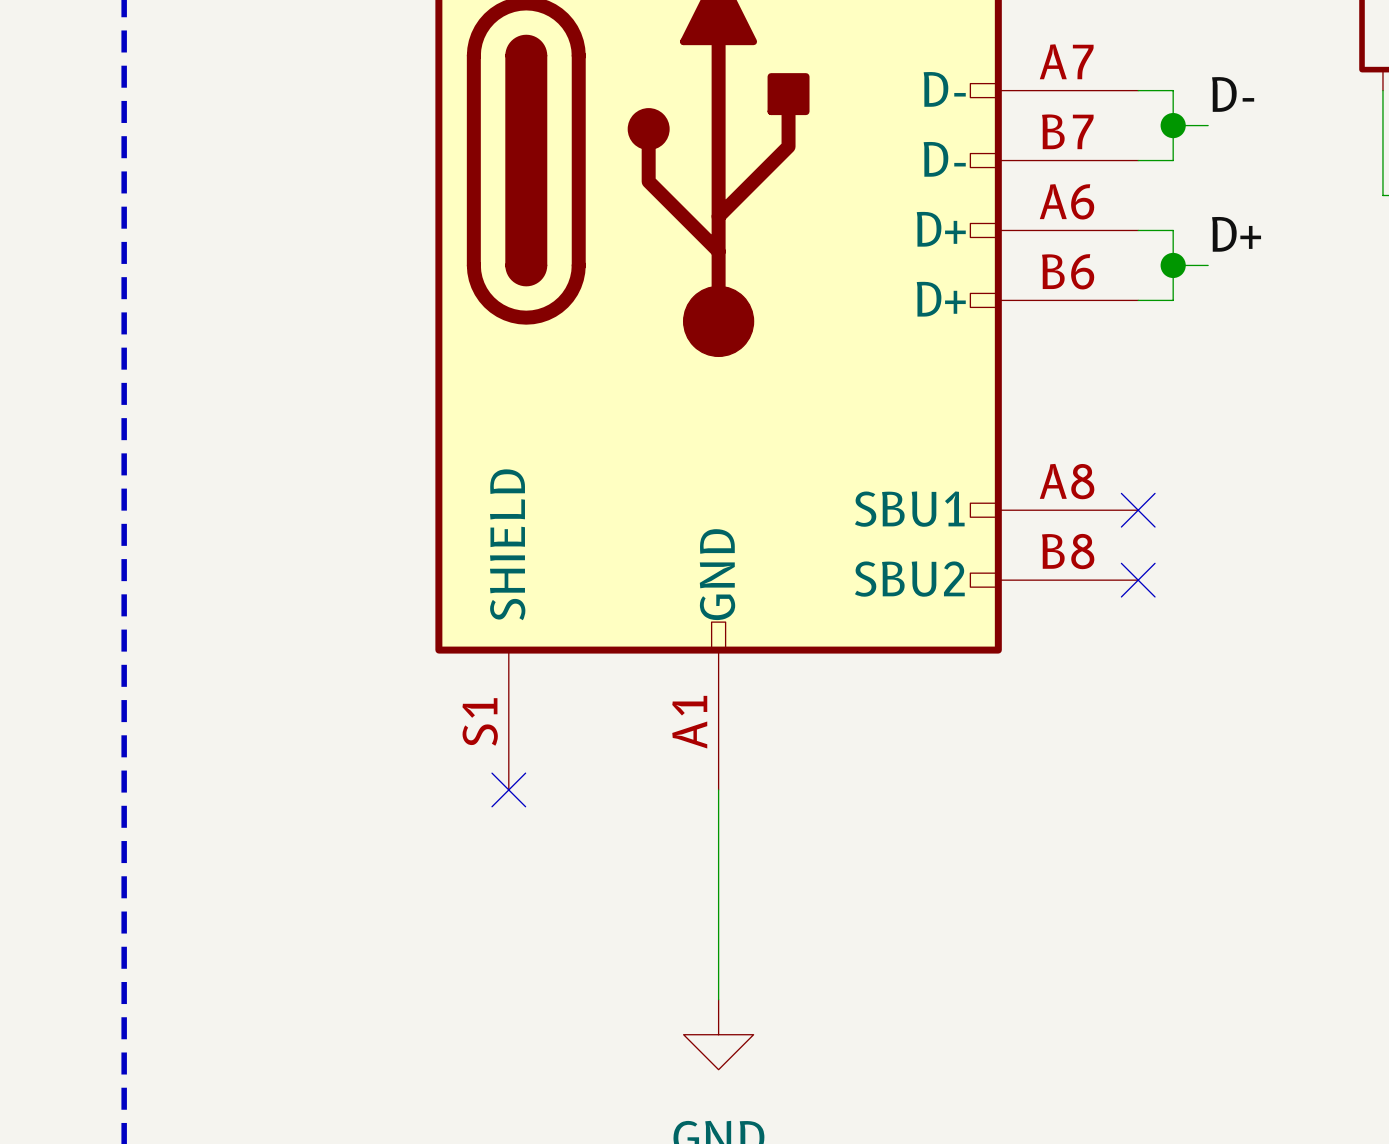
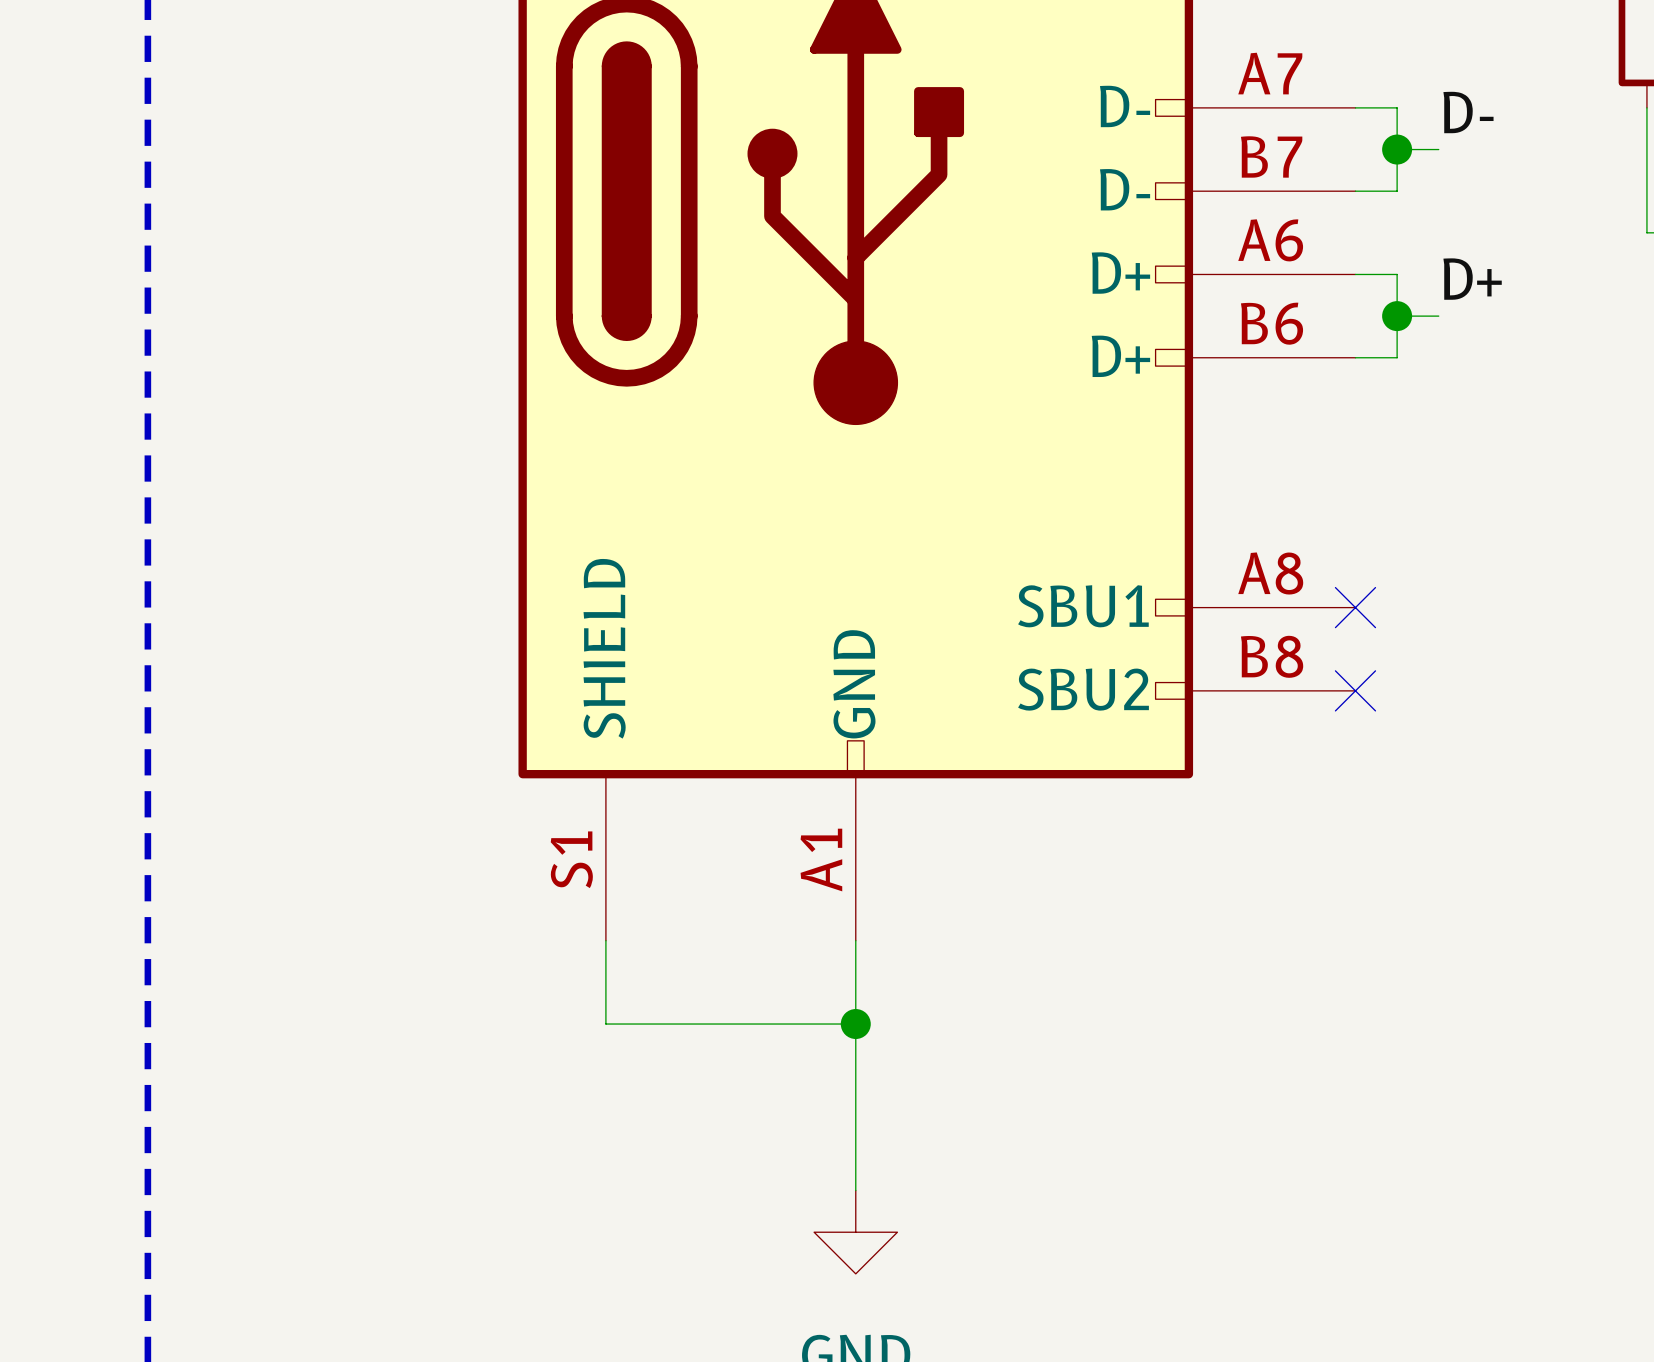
wire: none -> (605, 940) (605, 1024) (855, 1024)
no-connect mark: (508, 789) -> none
junction: none -> (855, 1024)

